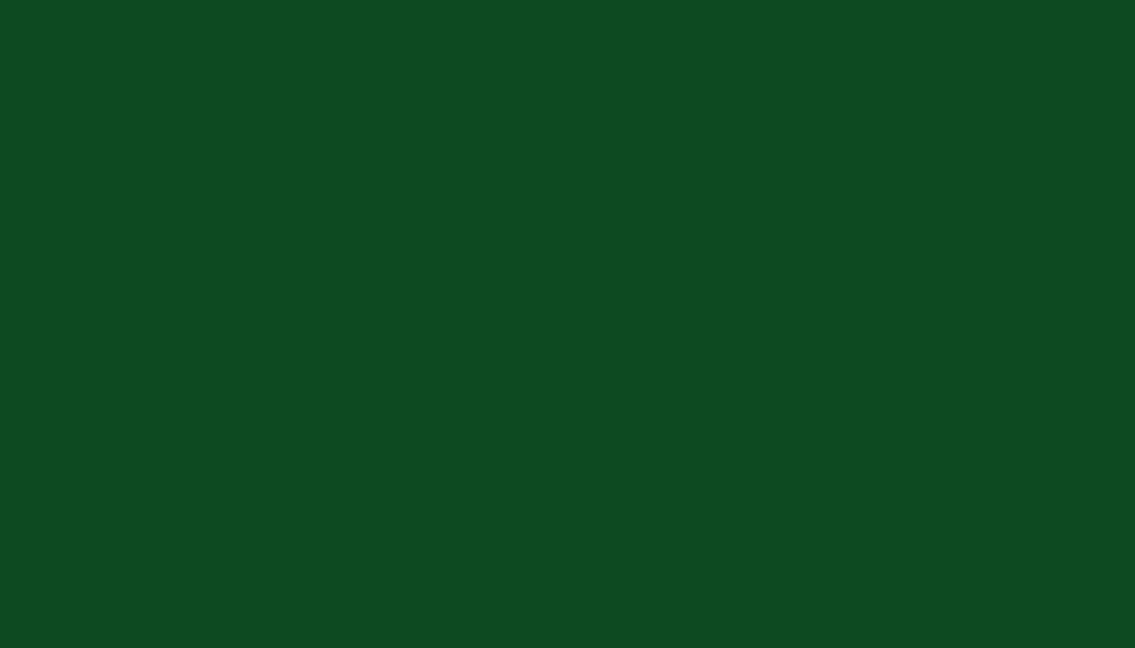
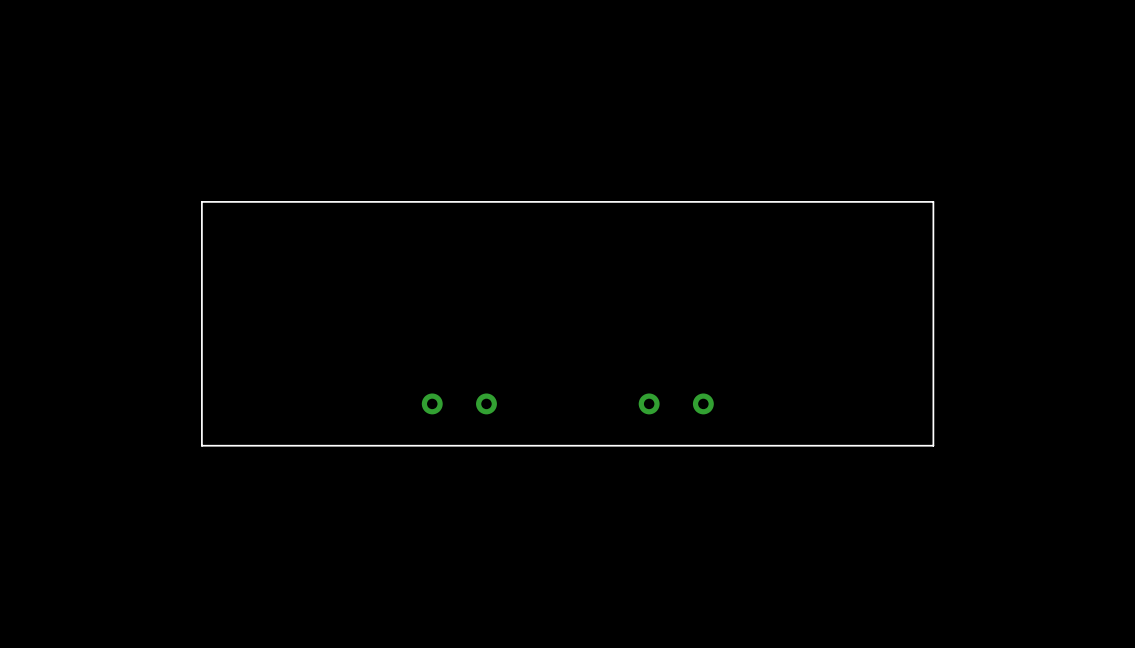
board edge: none -> (933, 201) (201, 201) (201, 445) (933, 445) (933, 201)
via: none -> (432, 403)
via: none -> (486, 403)
via: none -> (649, 403)
via: none -> (703, 403)

